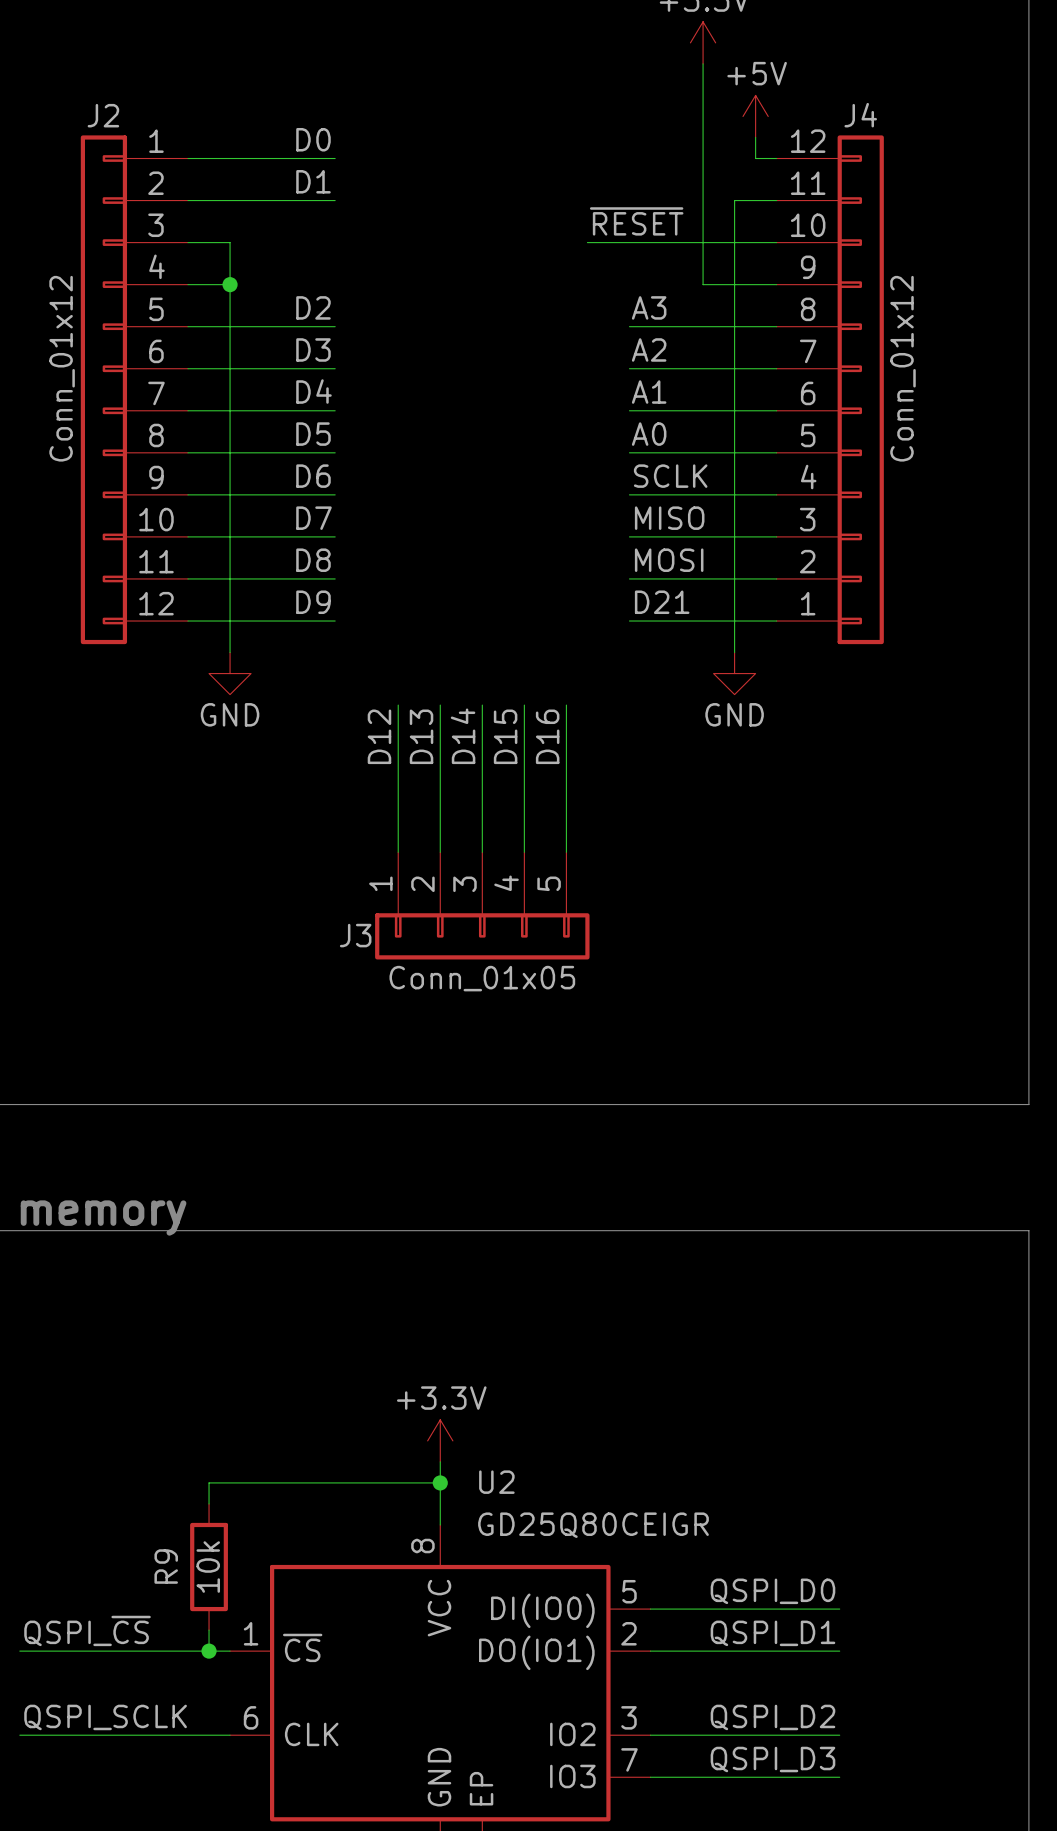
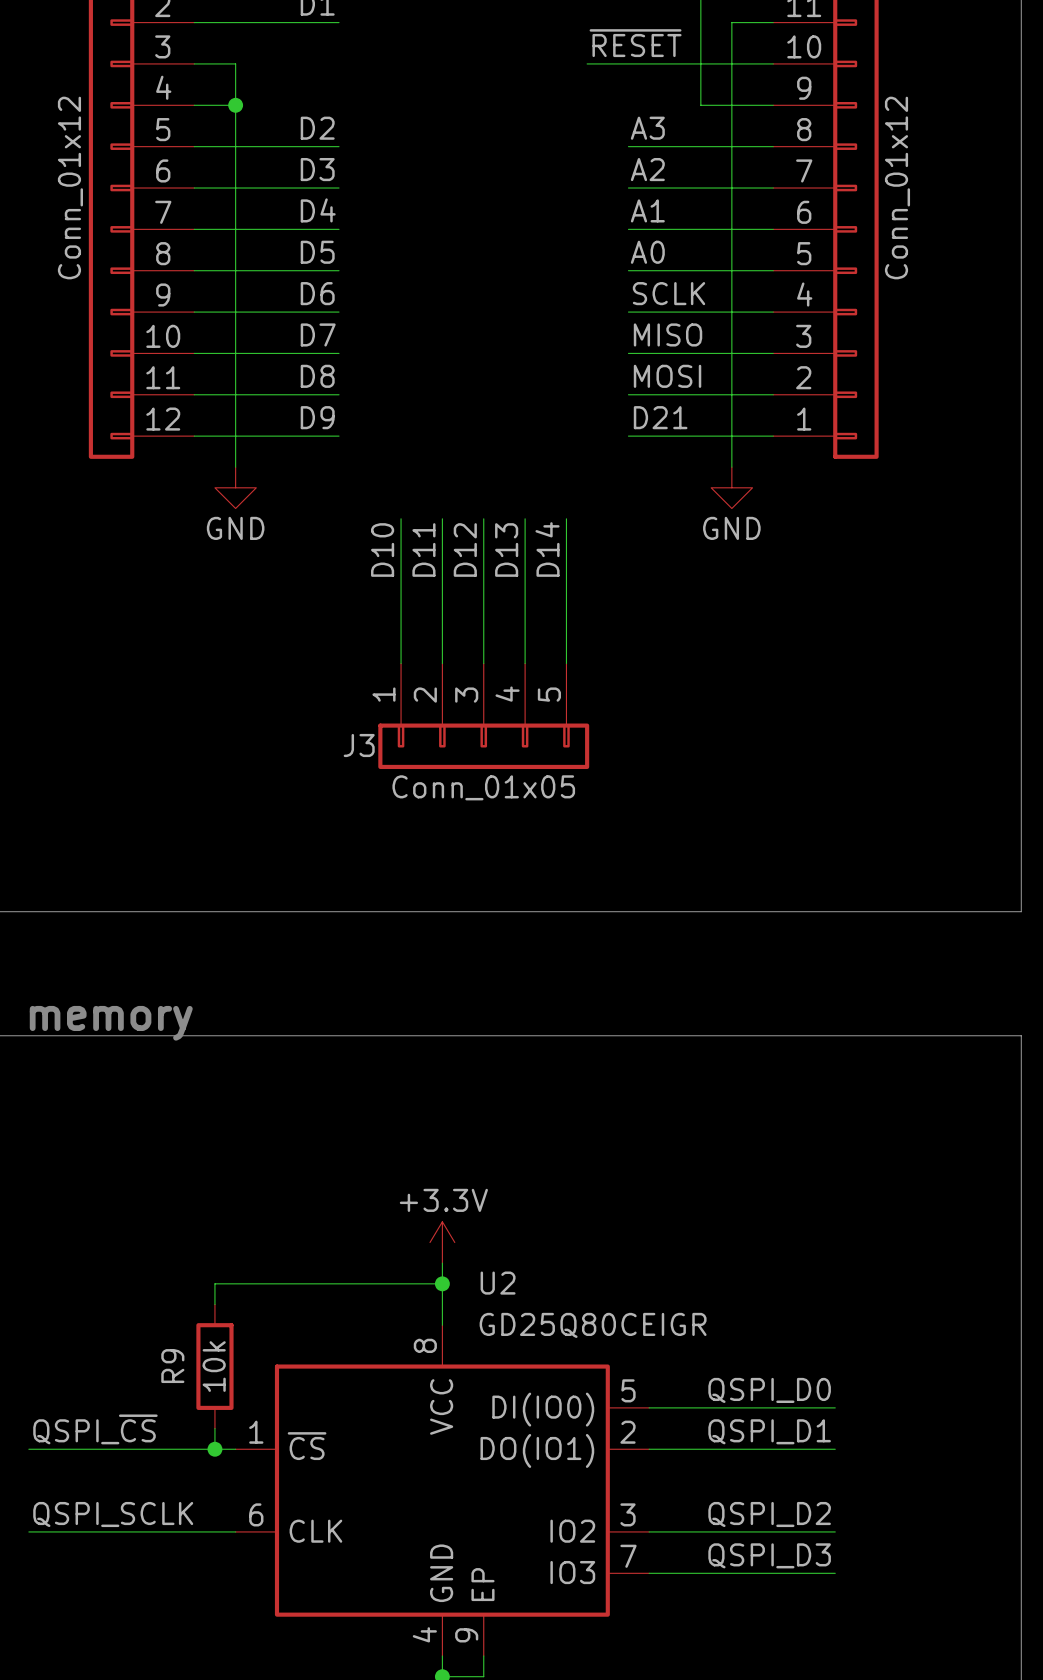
label: D12 (379, 736) -> D10 (382, 549)
label: D13 (421, 736) -> D11 (423, 549)
label: D14 (463, 736) -> D12 (465, 549)
label: D15 (505, 736) -> D13 (506, 549)
label: D16 (547, 736) -> D14 (547, 549)

